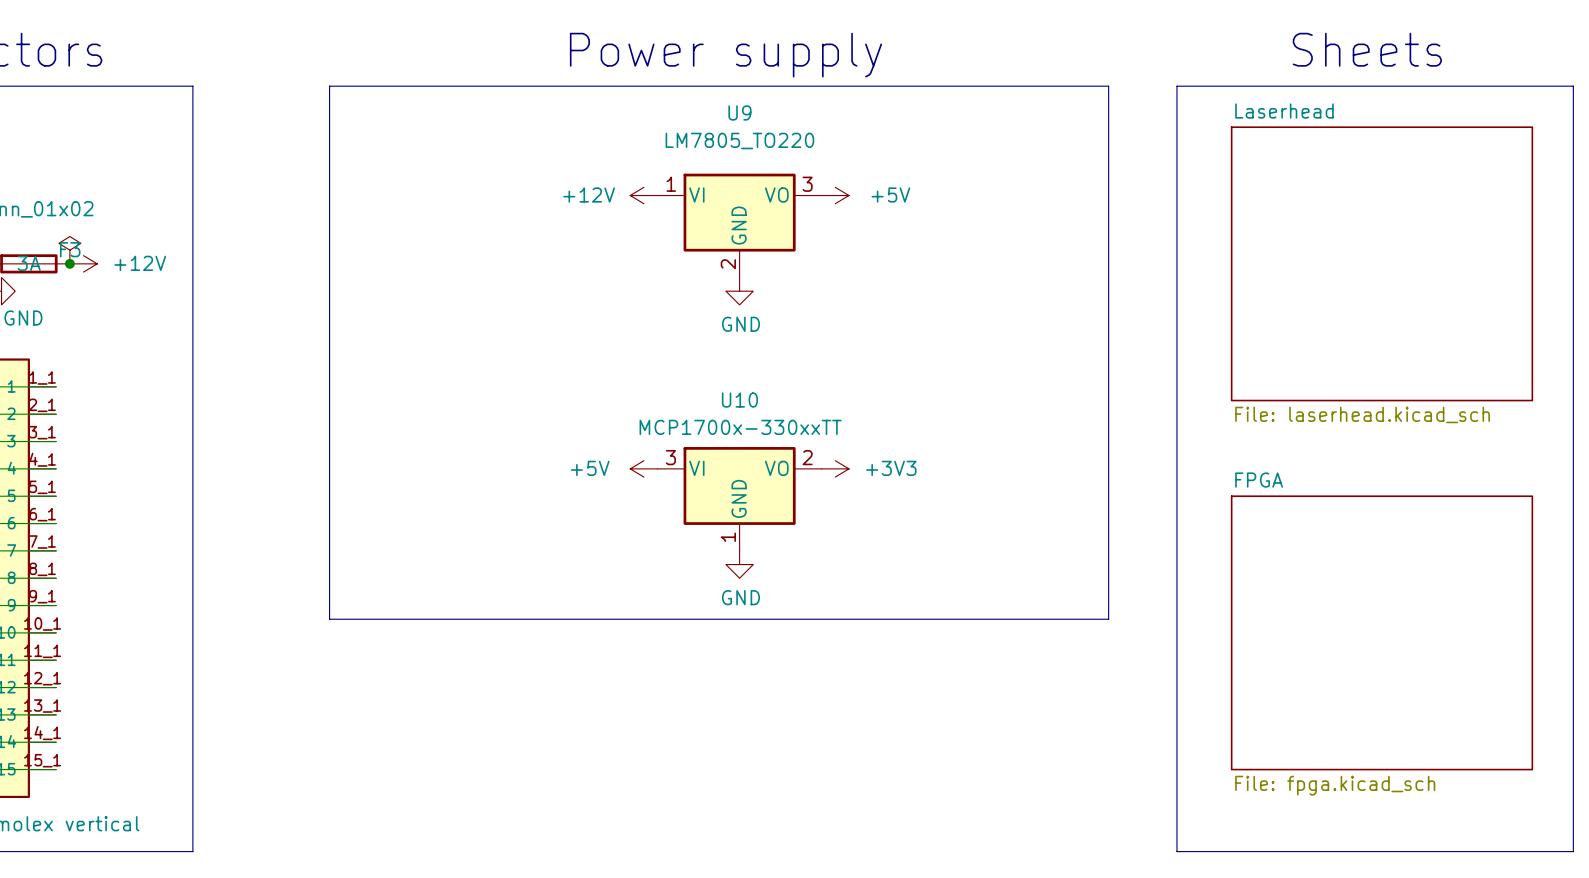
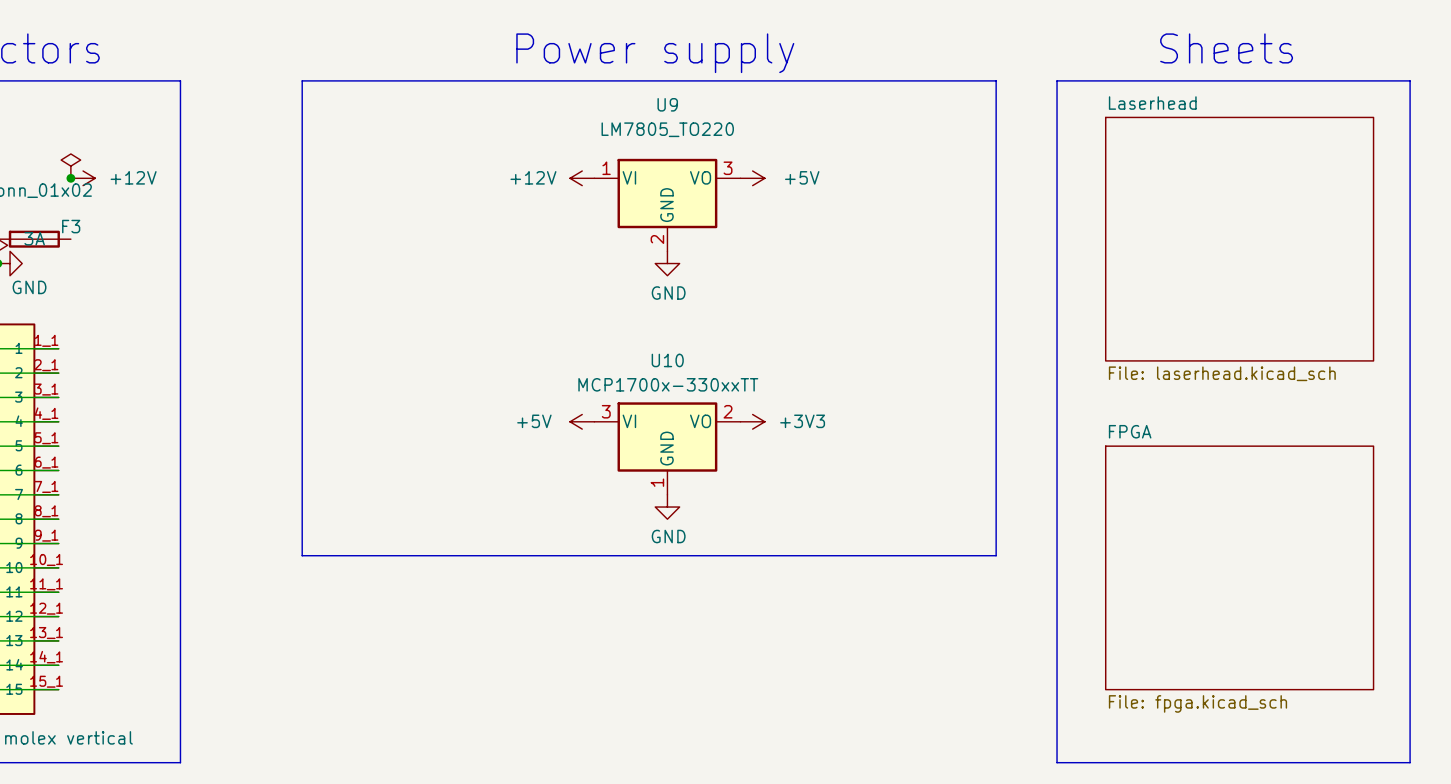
junction: none -> (70, 178)
power symbol position: (69, 250) -> (70, 166)
junction: (69, 263) -> none
power symbol position: +12V (83, 263) -> +12V (83, 178)

